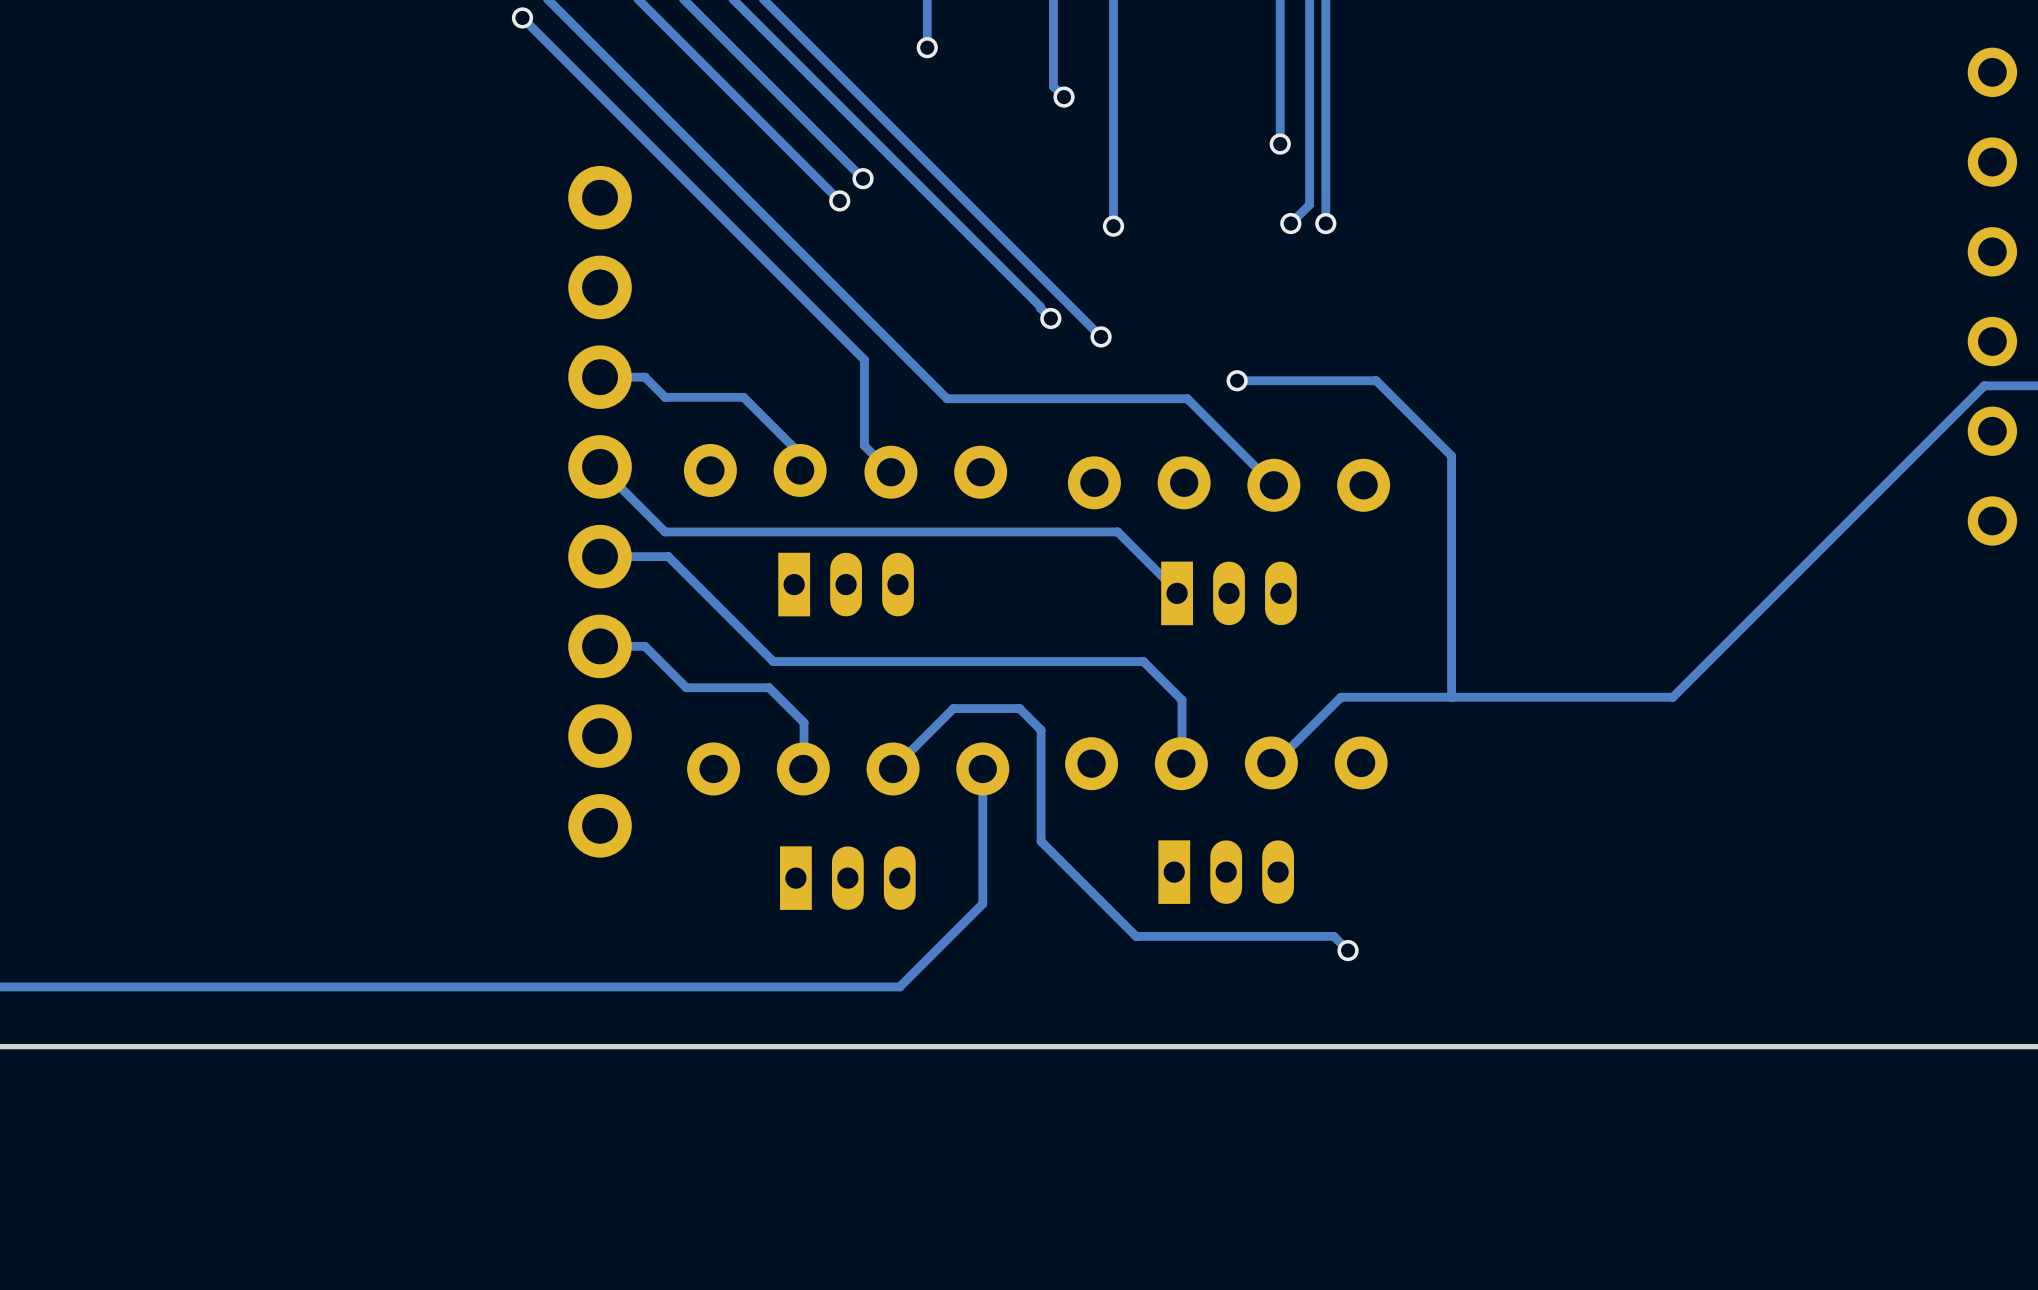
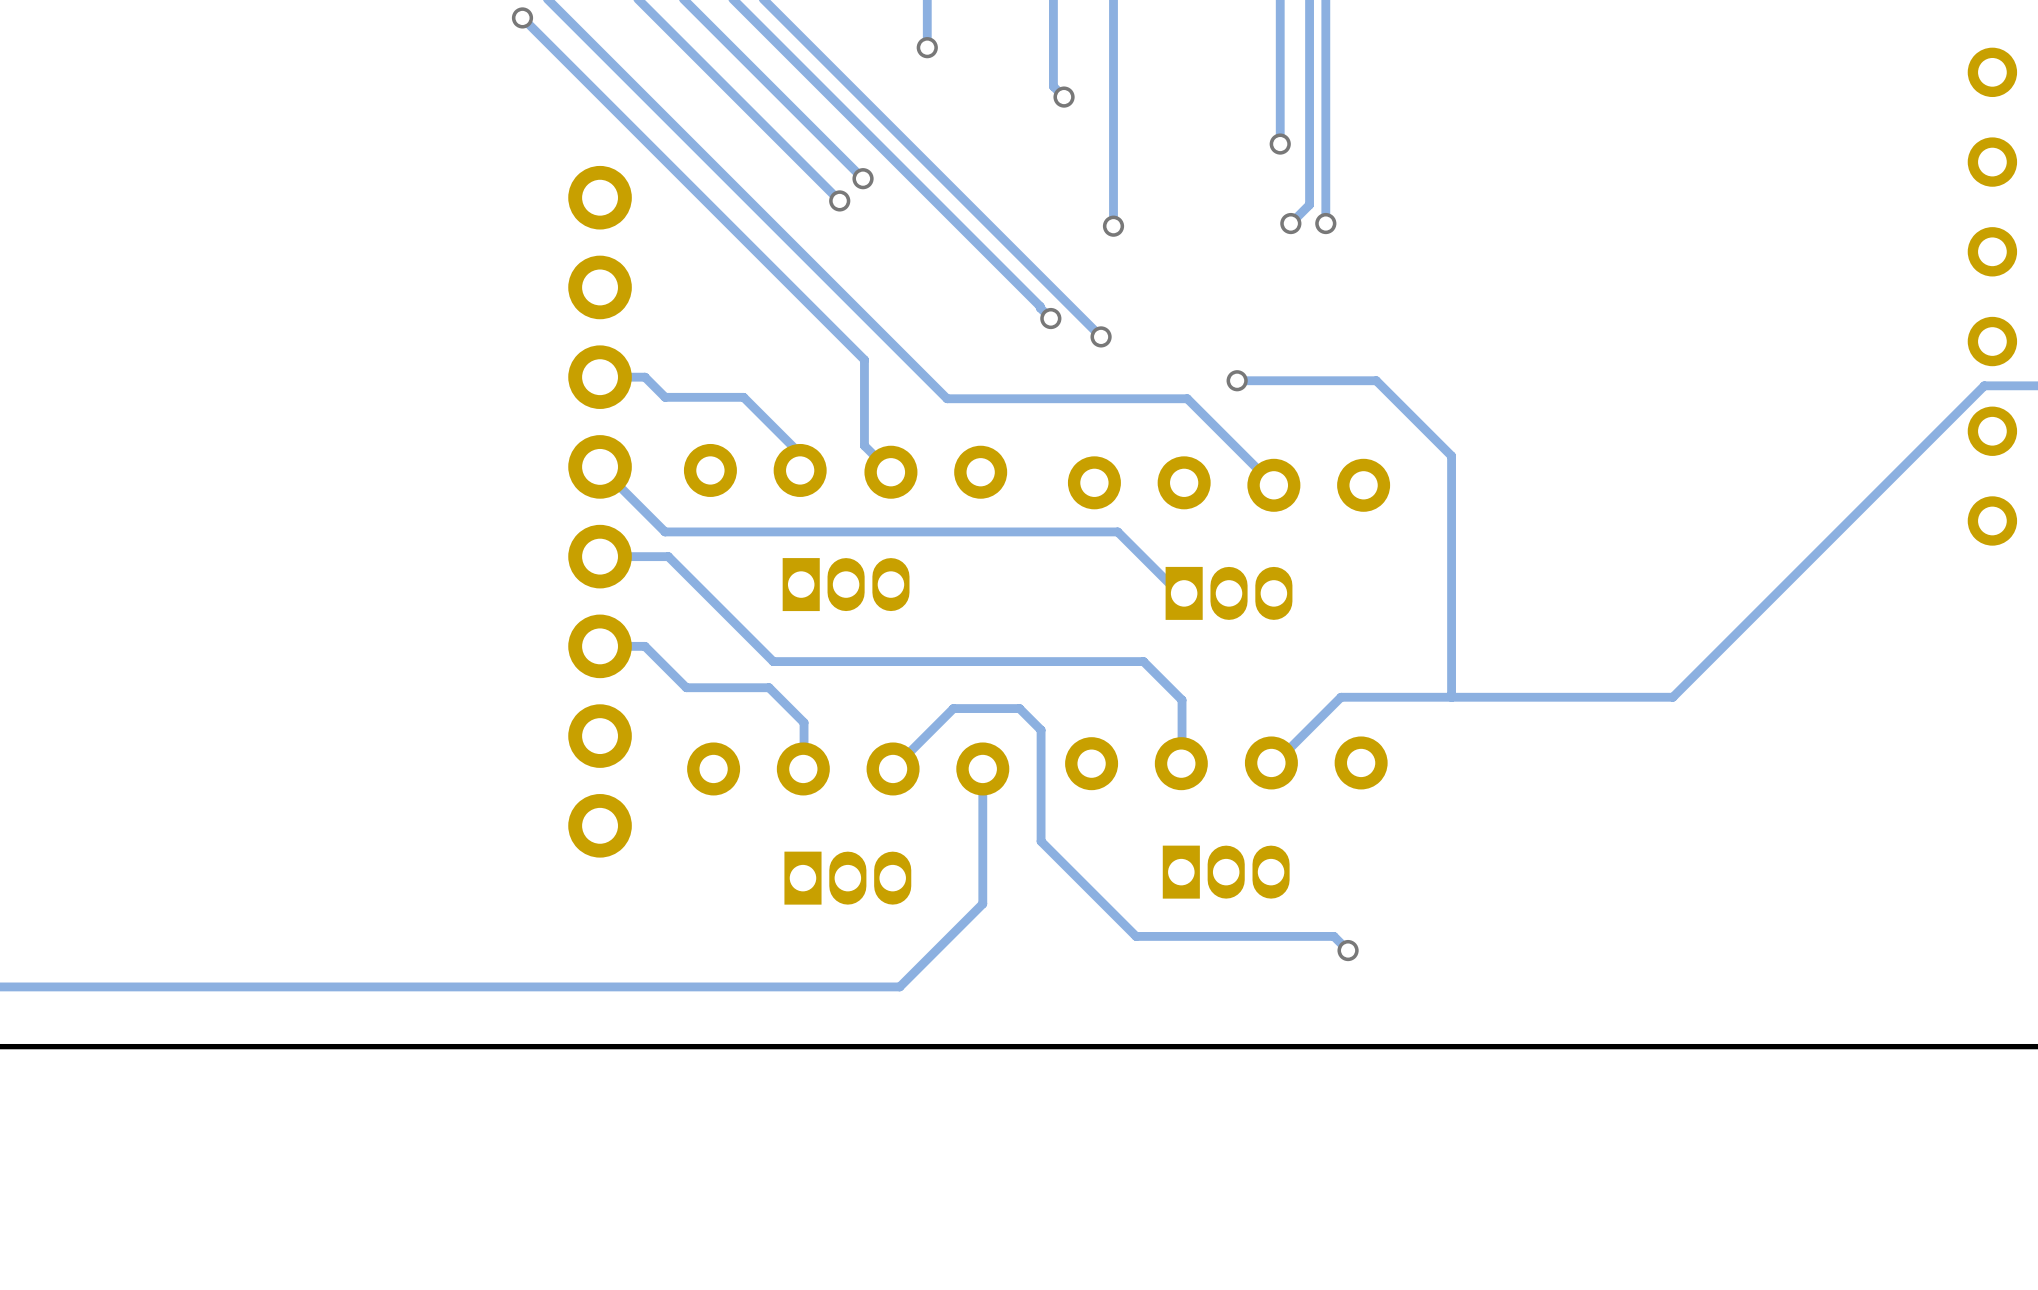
part footprint: [778, 552, 914, 617] -> [782, 558, 910, 612]
part footprint: [1161, 561, 1297, 626] -> [1165, 566, 1293, 620]
part footprint: [1158, 840, 1295, 904] -> [1162, 845, 1290, 899]
part footprint: [780, 846, 916, 910] -> [784, 851, 912, 905]

